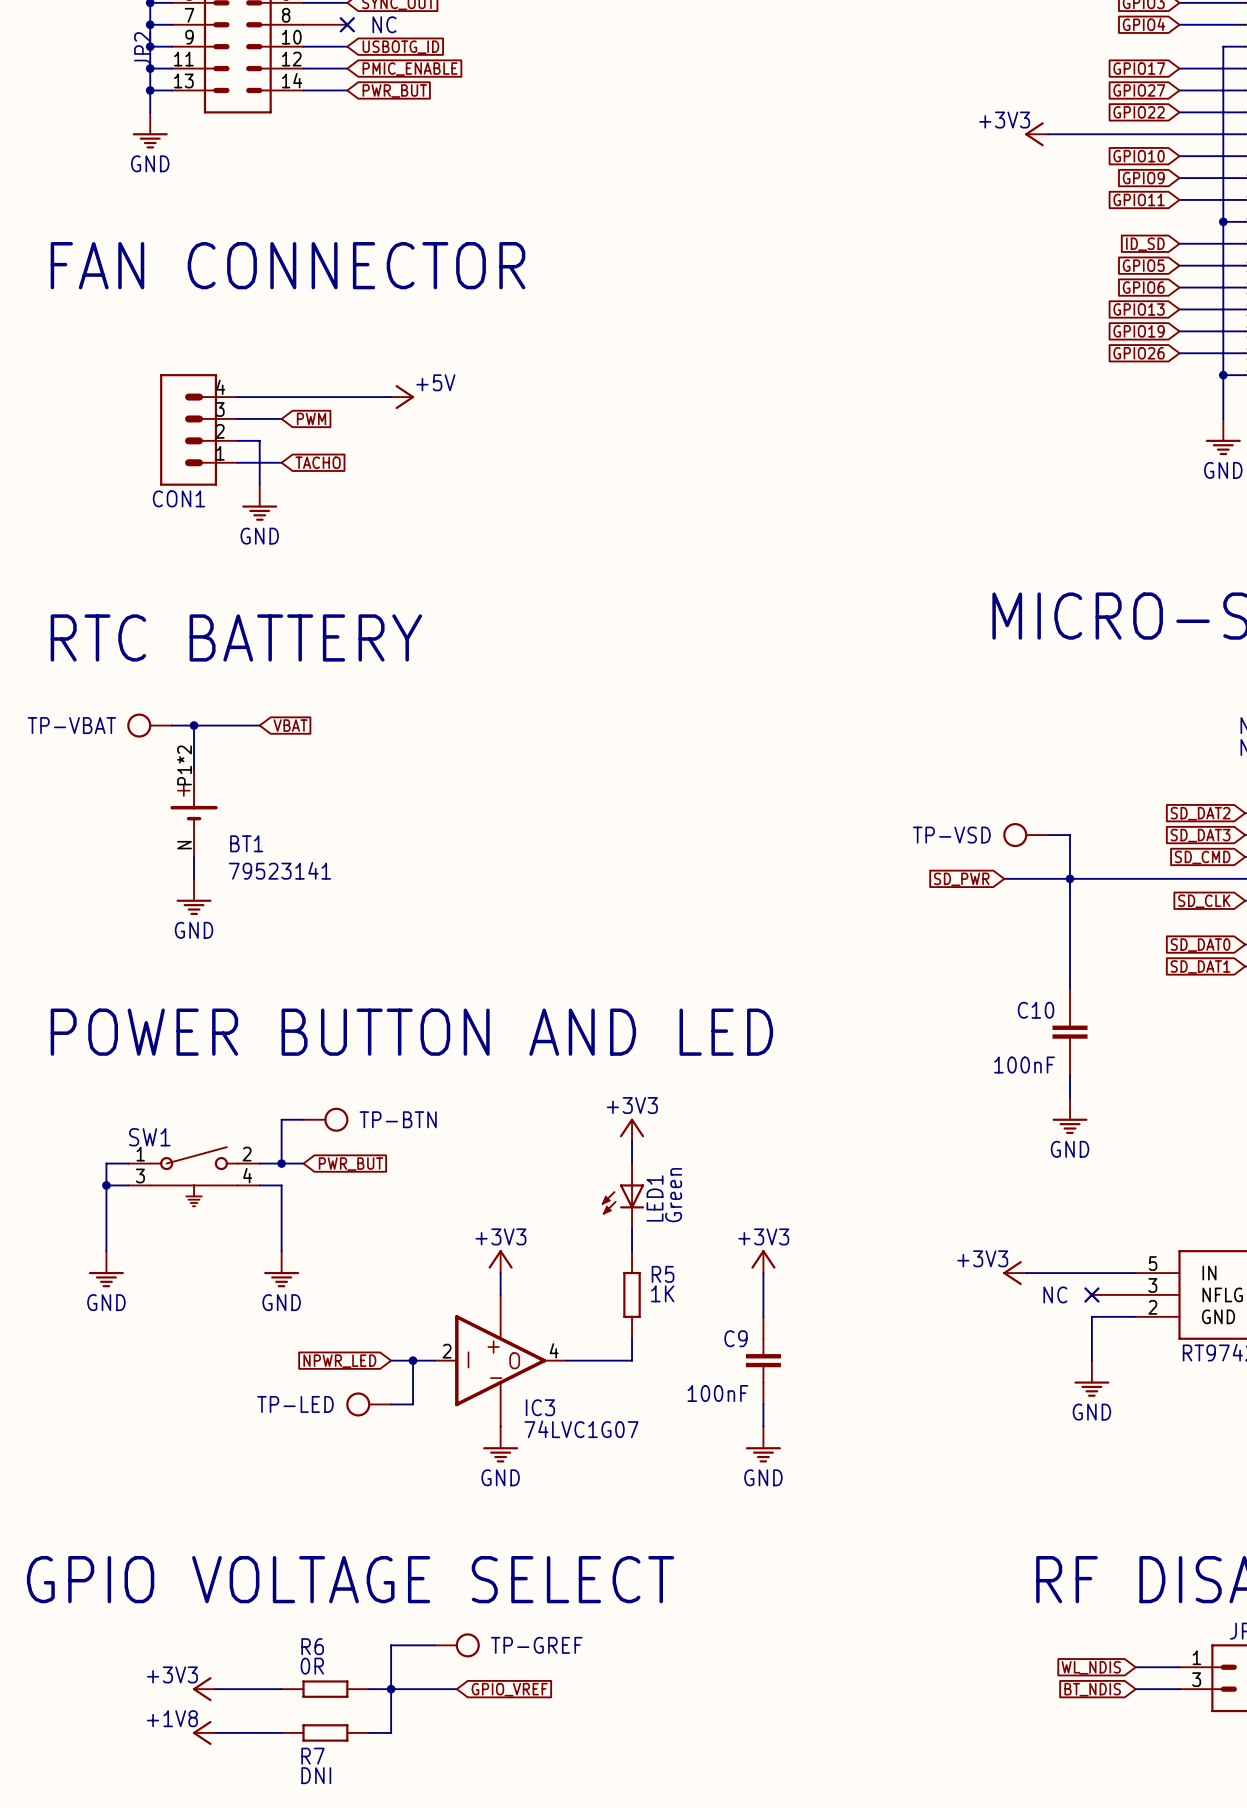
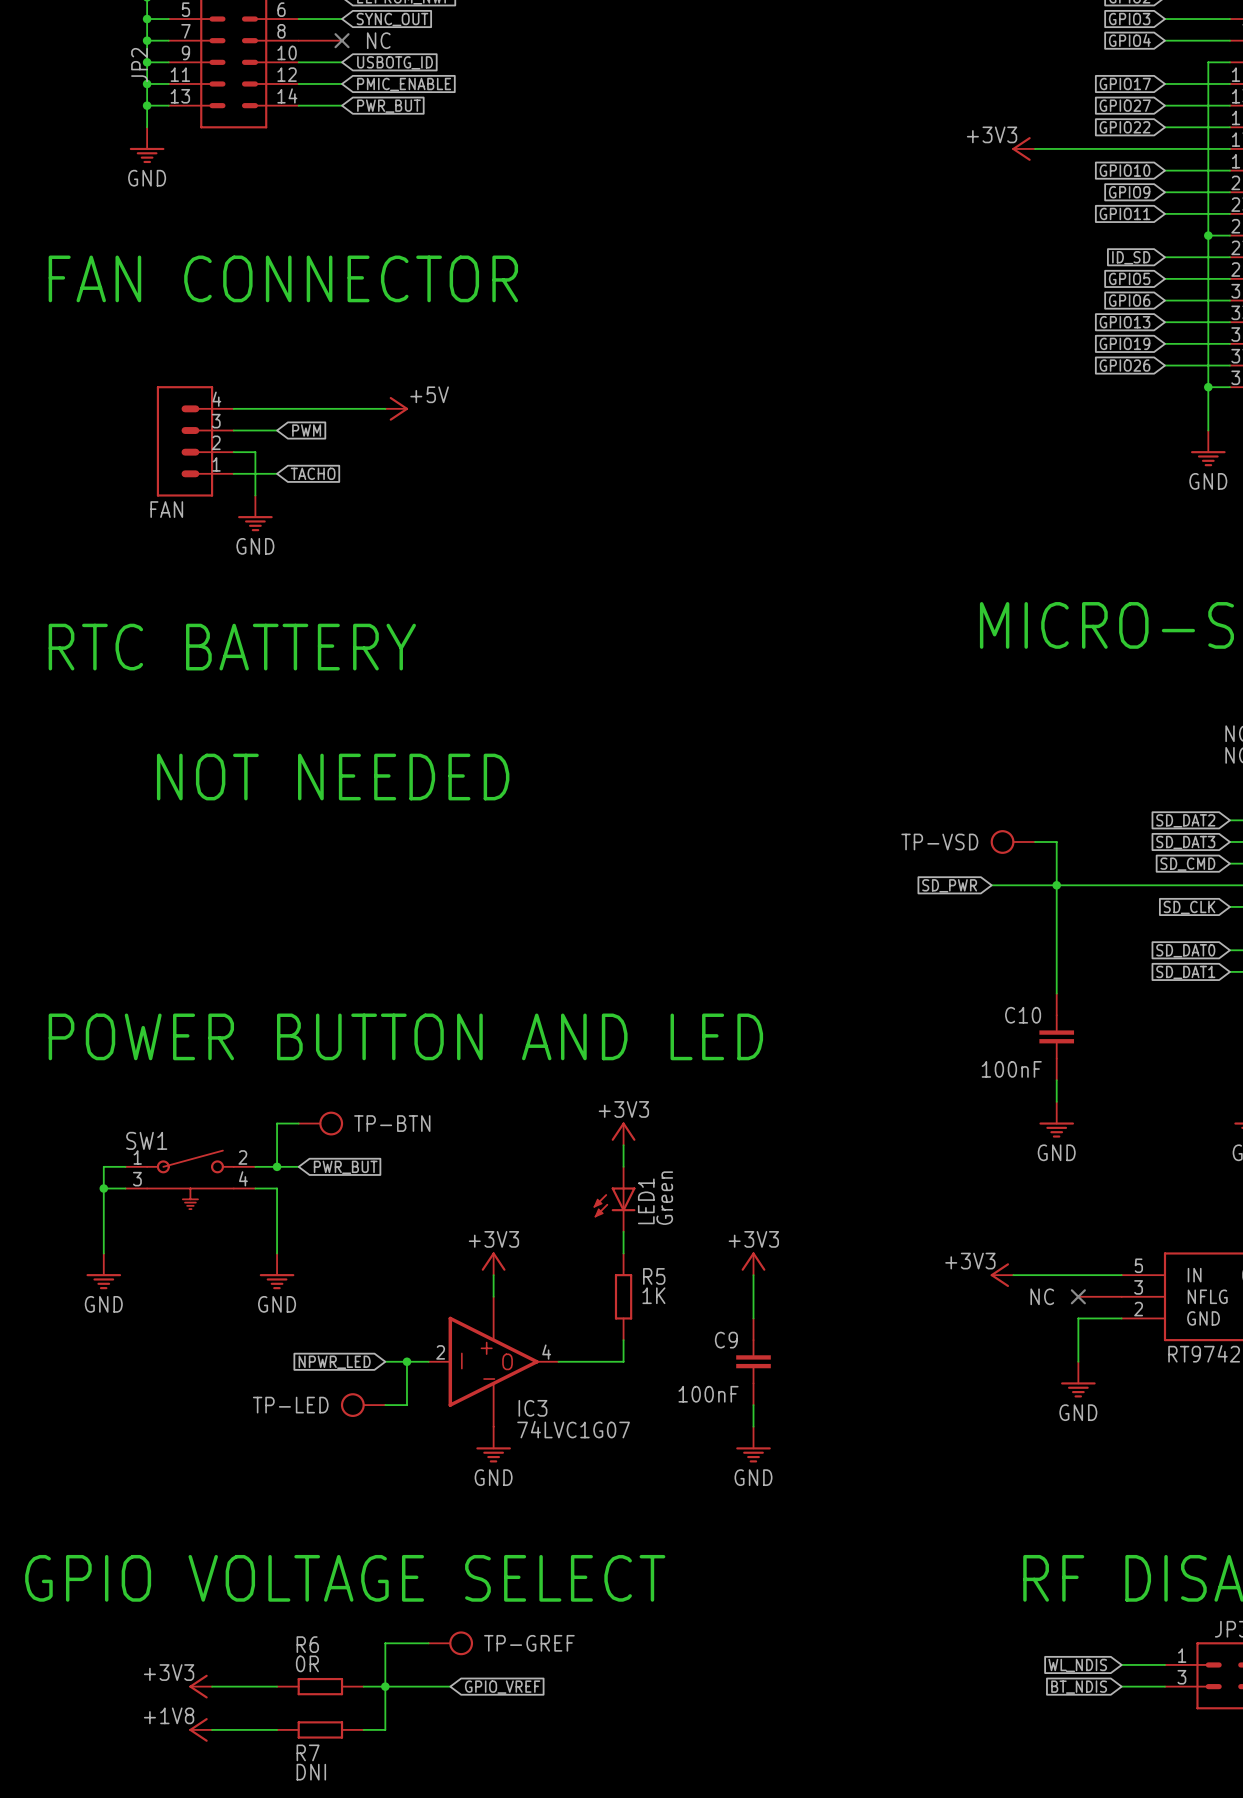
CON1 name: CON1 (178, 498) -> FAN (166, 509)
TP-VBAT: (149, 725) -> none
wire: (172, 725) (259, 725) -> none
wire: (194, 725) (194, 769) -> none
junction: (194, 725) -> none
global label: VBAT (290, 725) -> none
text: none -> NOT NEEDED (333, 777)
BT1: 79523141 (194, 813) -> none
wire: (194, 856) (194, 878) -> none
power symbol: GND (194, 896) -> none

